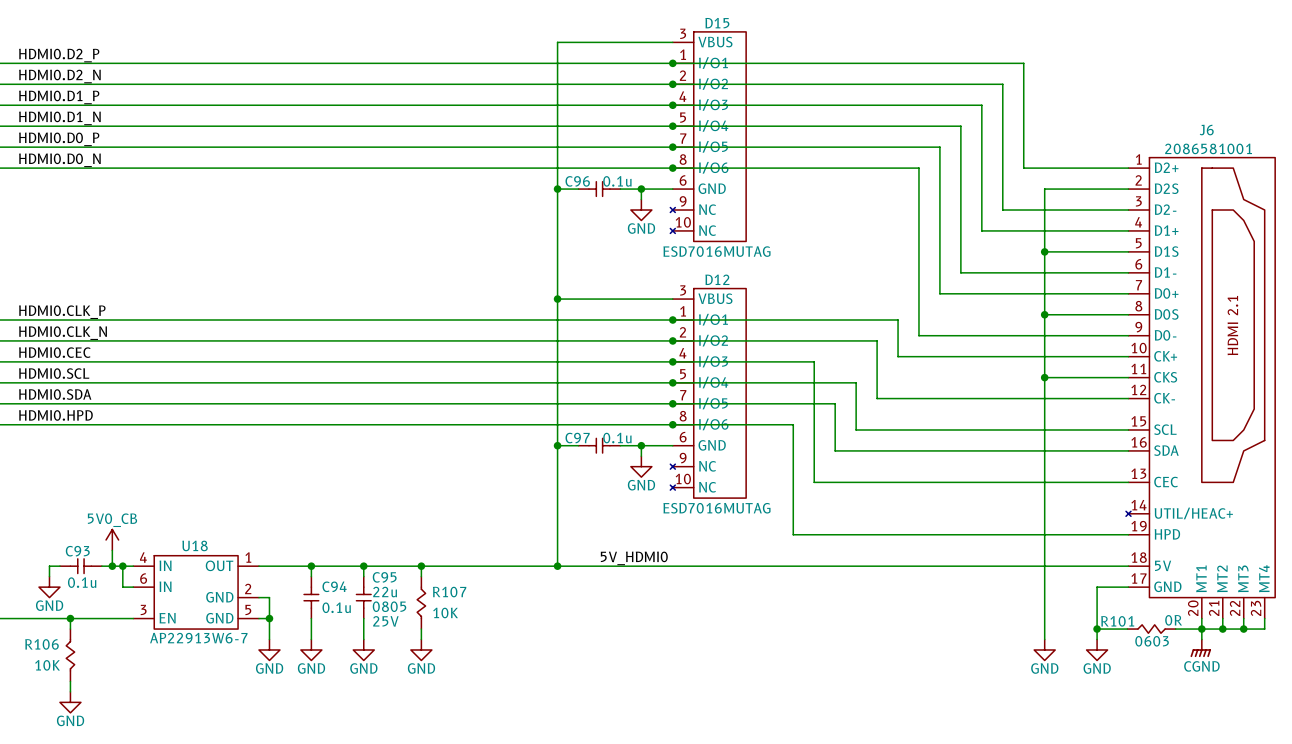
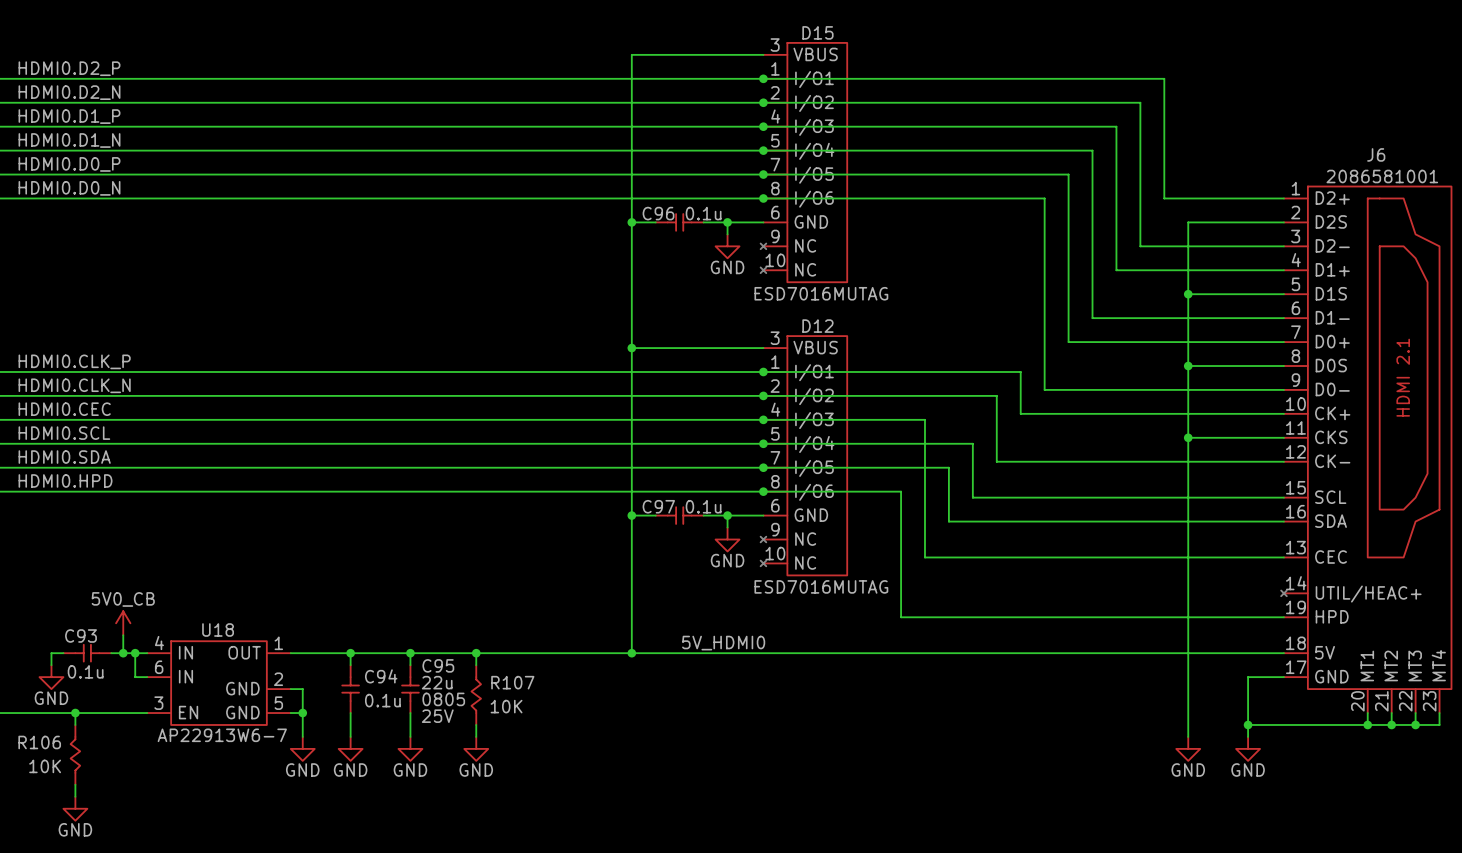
R101: 0R (1151, 629) -> none
wire: (1201, 629) (1201, 639) -> none
power symbol: CGND (1200, 648) -> none

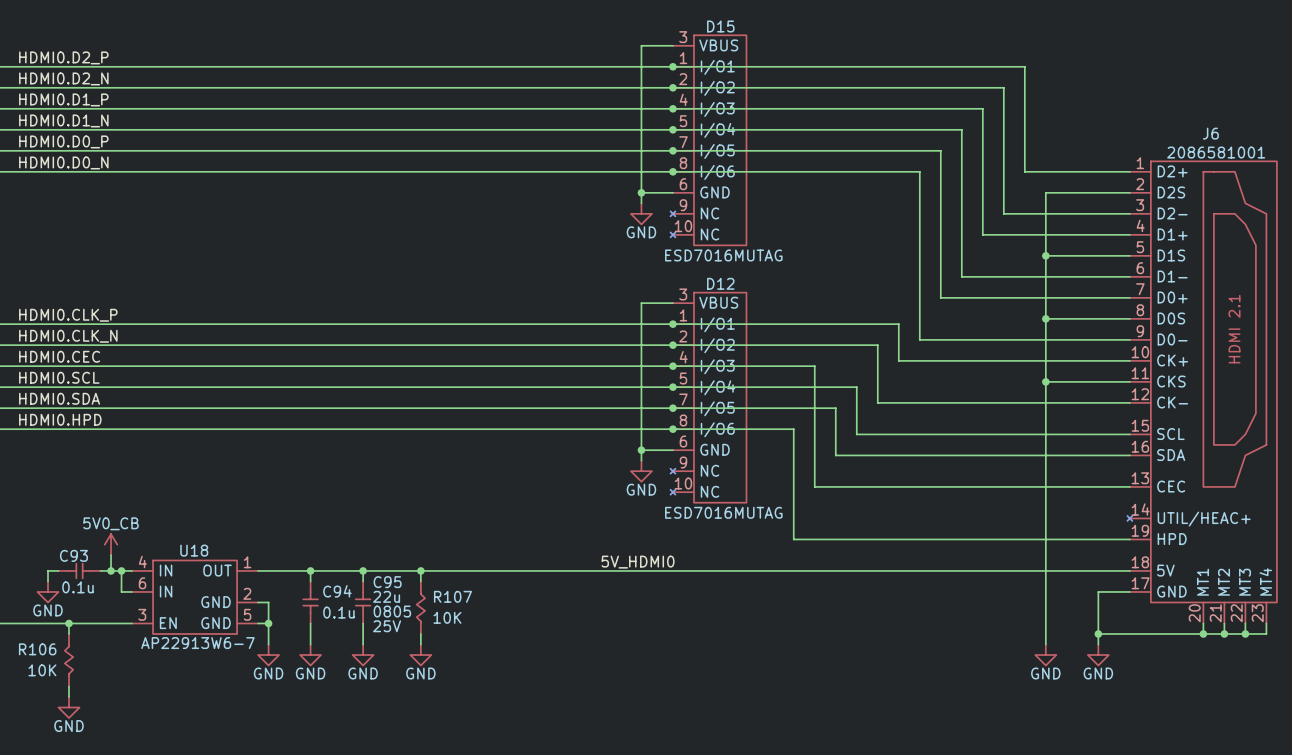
wire: (727, 54) (631, 54) (631, 653) -> none
wire: (631, 222) (655, 222) -> none
junction: (631, 222) -> none
C96: 0.1u (679, 222) -> none
wire: (703, 222) (727, 222) -> (641, 45) (641, 192)
wire: (631, 348) (727, 348) -> none
junction: (631, 348) -> none
wire: (631, 515) (655, 515) -> none
junction: (631, 515) -> none
C97: 0.1u (679, 515) -> none
wire: (703, 515) (727, 515) -> (641, 303) (641, 450)
junction: (631, 653) -> none

